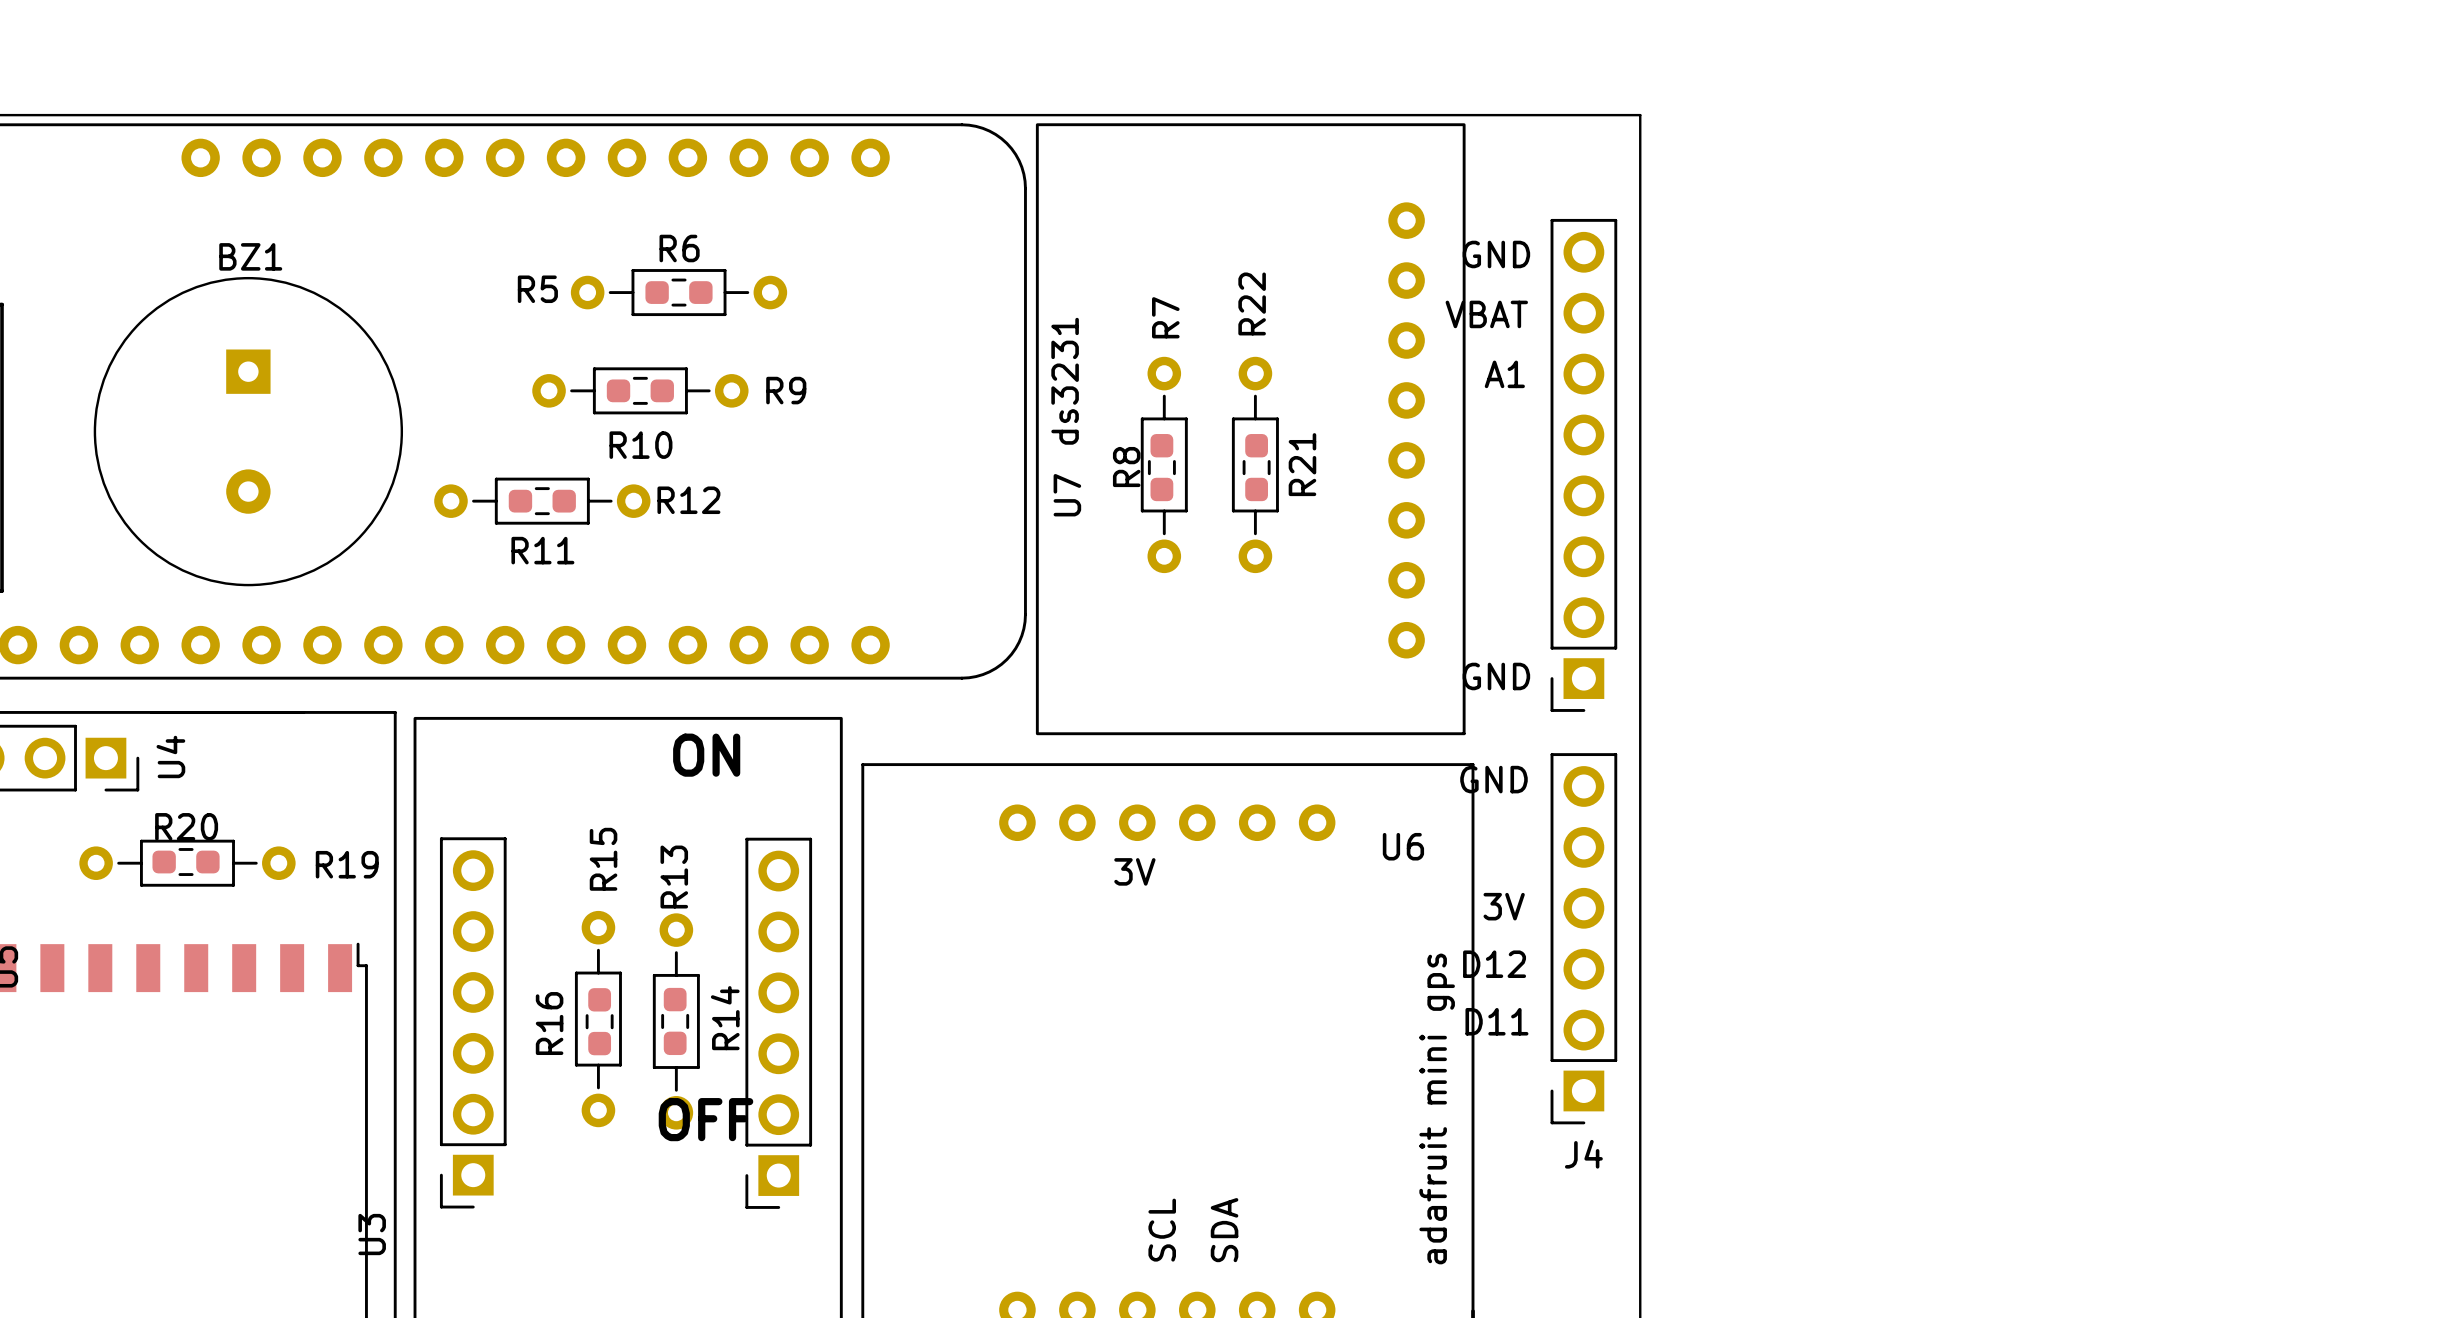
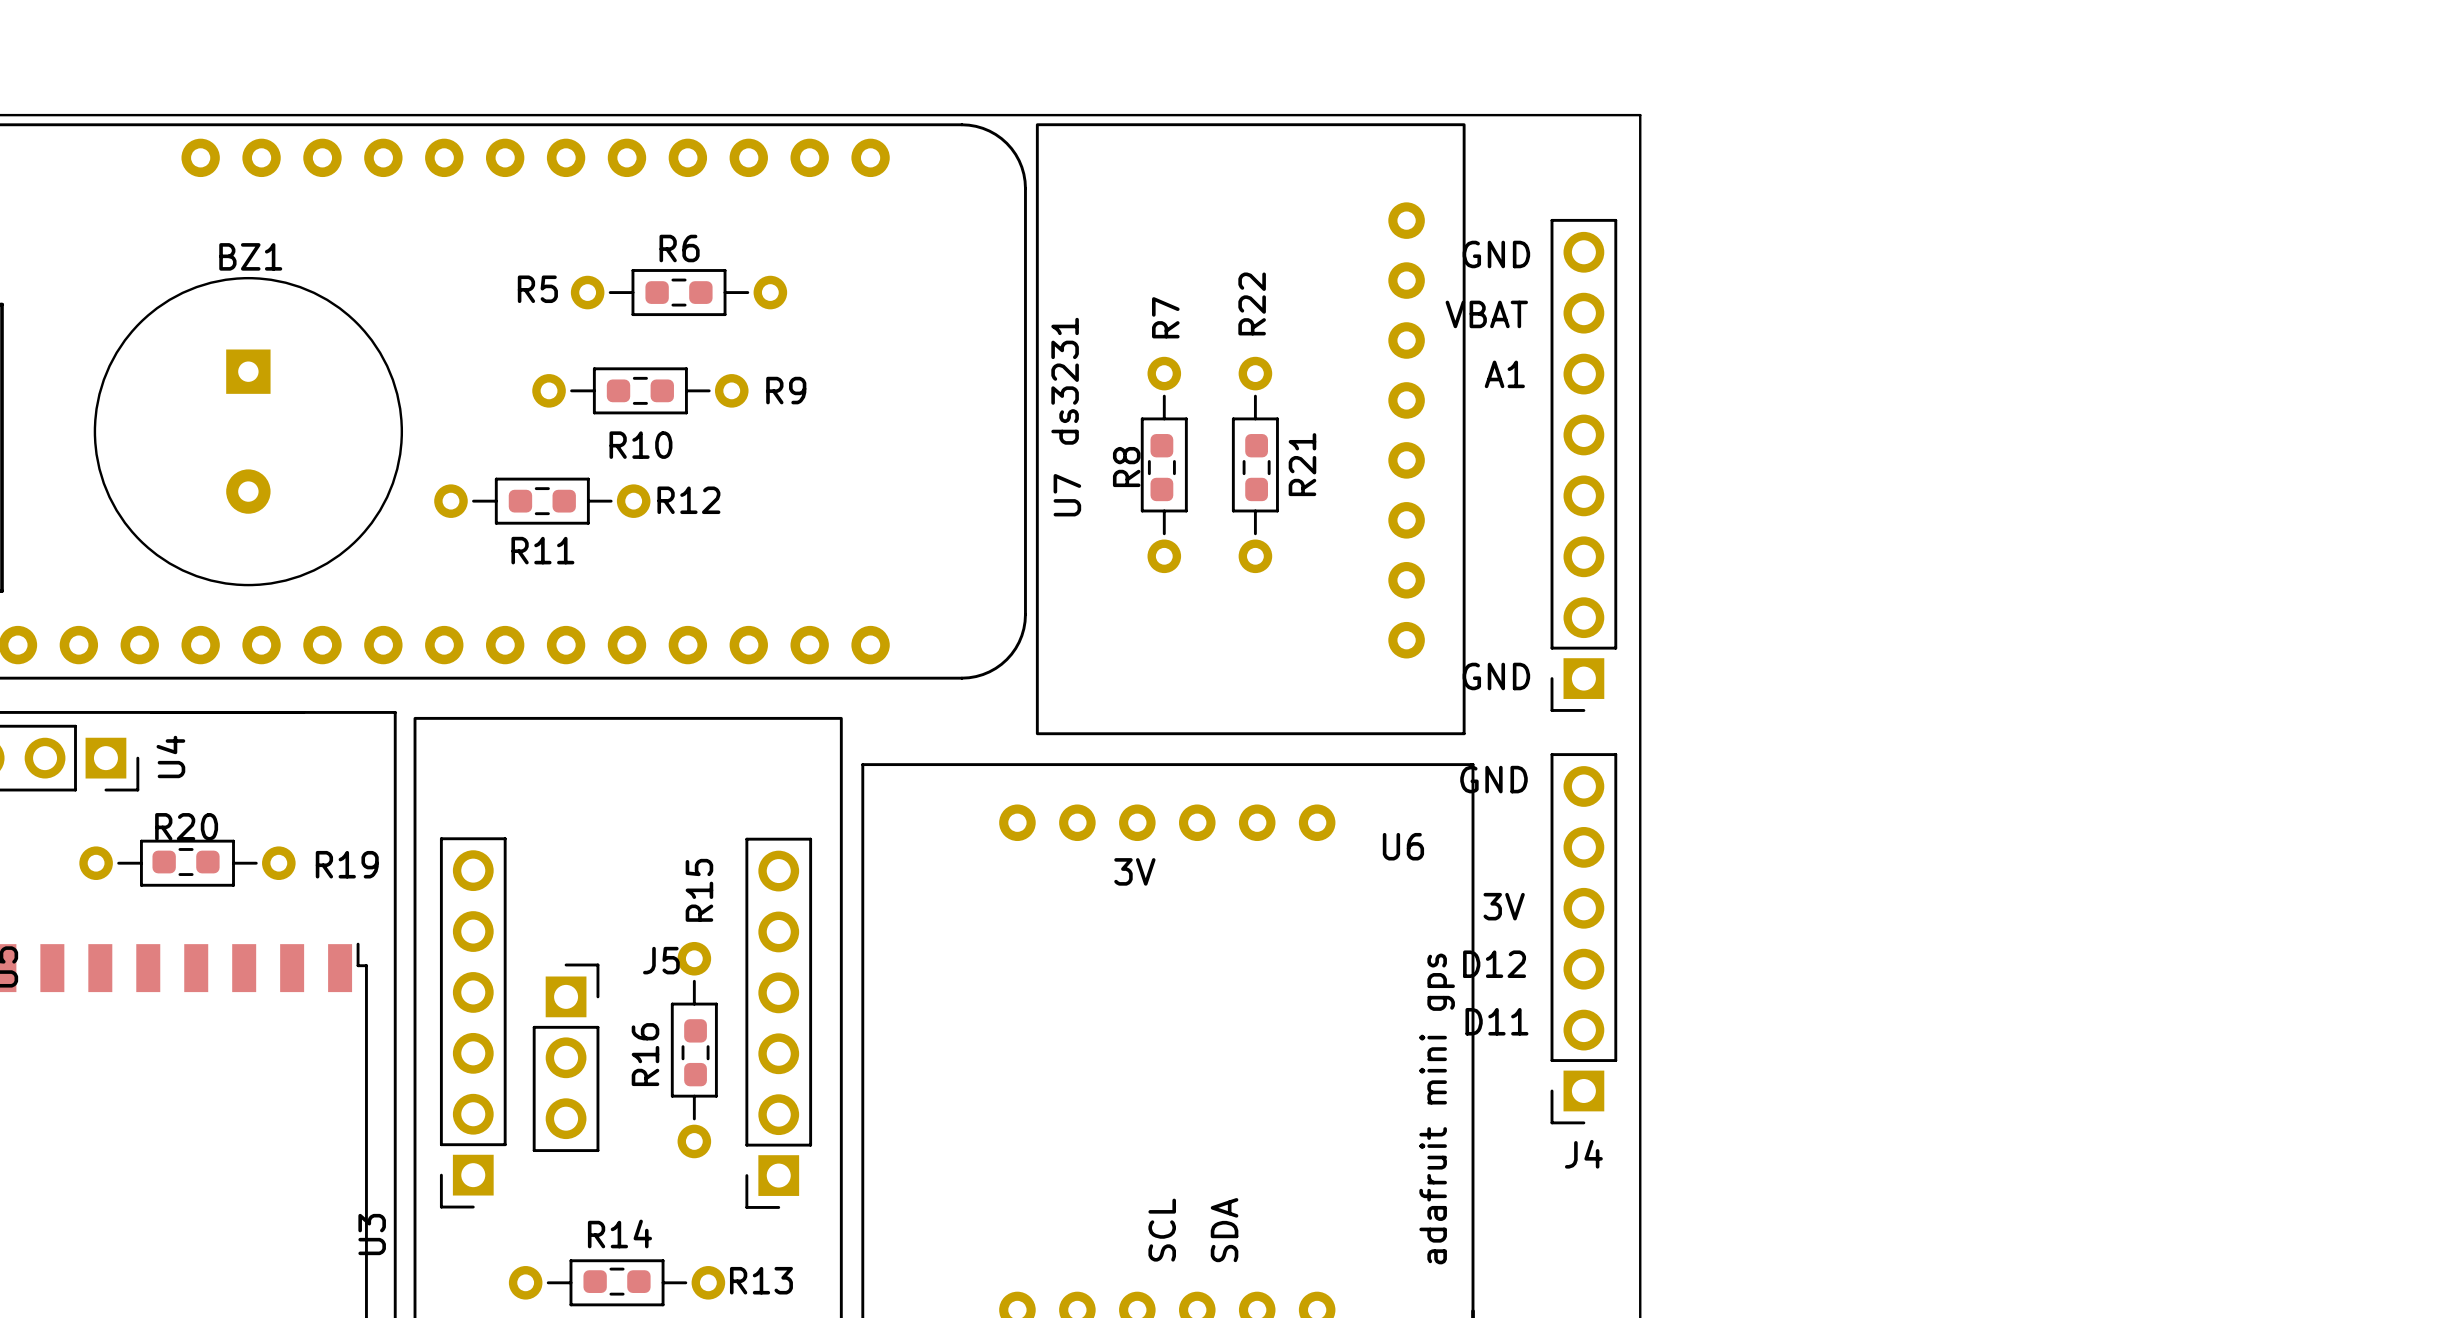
text: ON (706, 755) -> none
R14 name position: R14 (725, 1018) -> R14 (619, 1233)
R15 position: (598, 1019) -> (694, 1050)
R16 position: (599, 1021) -> (695, 1052)
R14 rotation: 0° (675, 1021) -> 90° clockwise (617, 1281)
R14 position: (675, 1021) -> (617, 1281)
R13 rotation: 0° (676, 1021) -> 90° clockwise (617, 1282)
R13 position: (676, 1021) -> (617, 1282)
J5: none -> (566, 1057)
text: OFF (705, 1119) -> none

